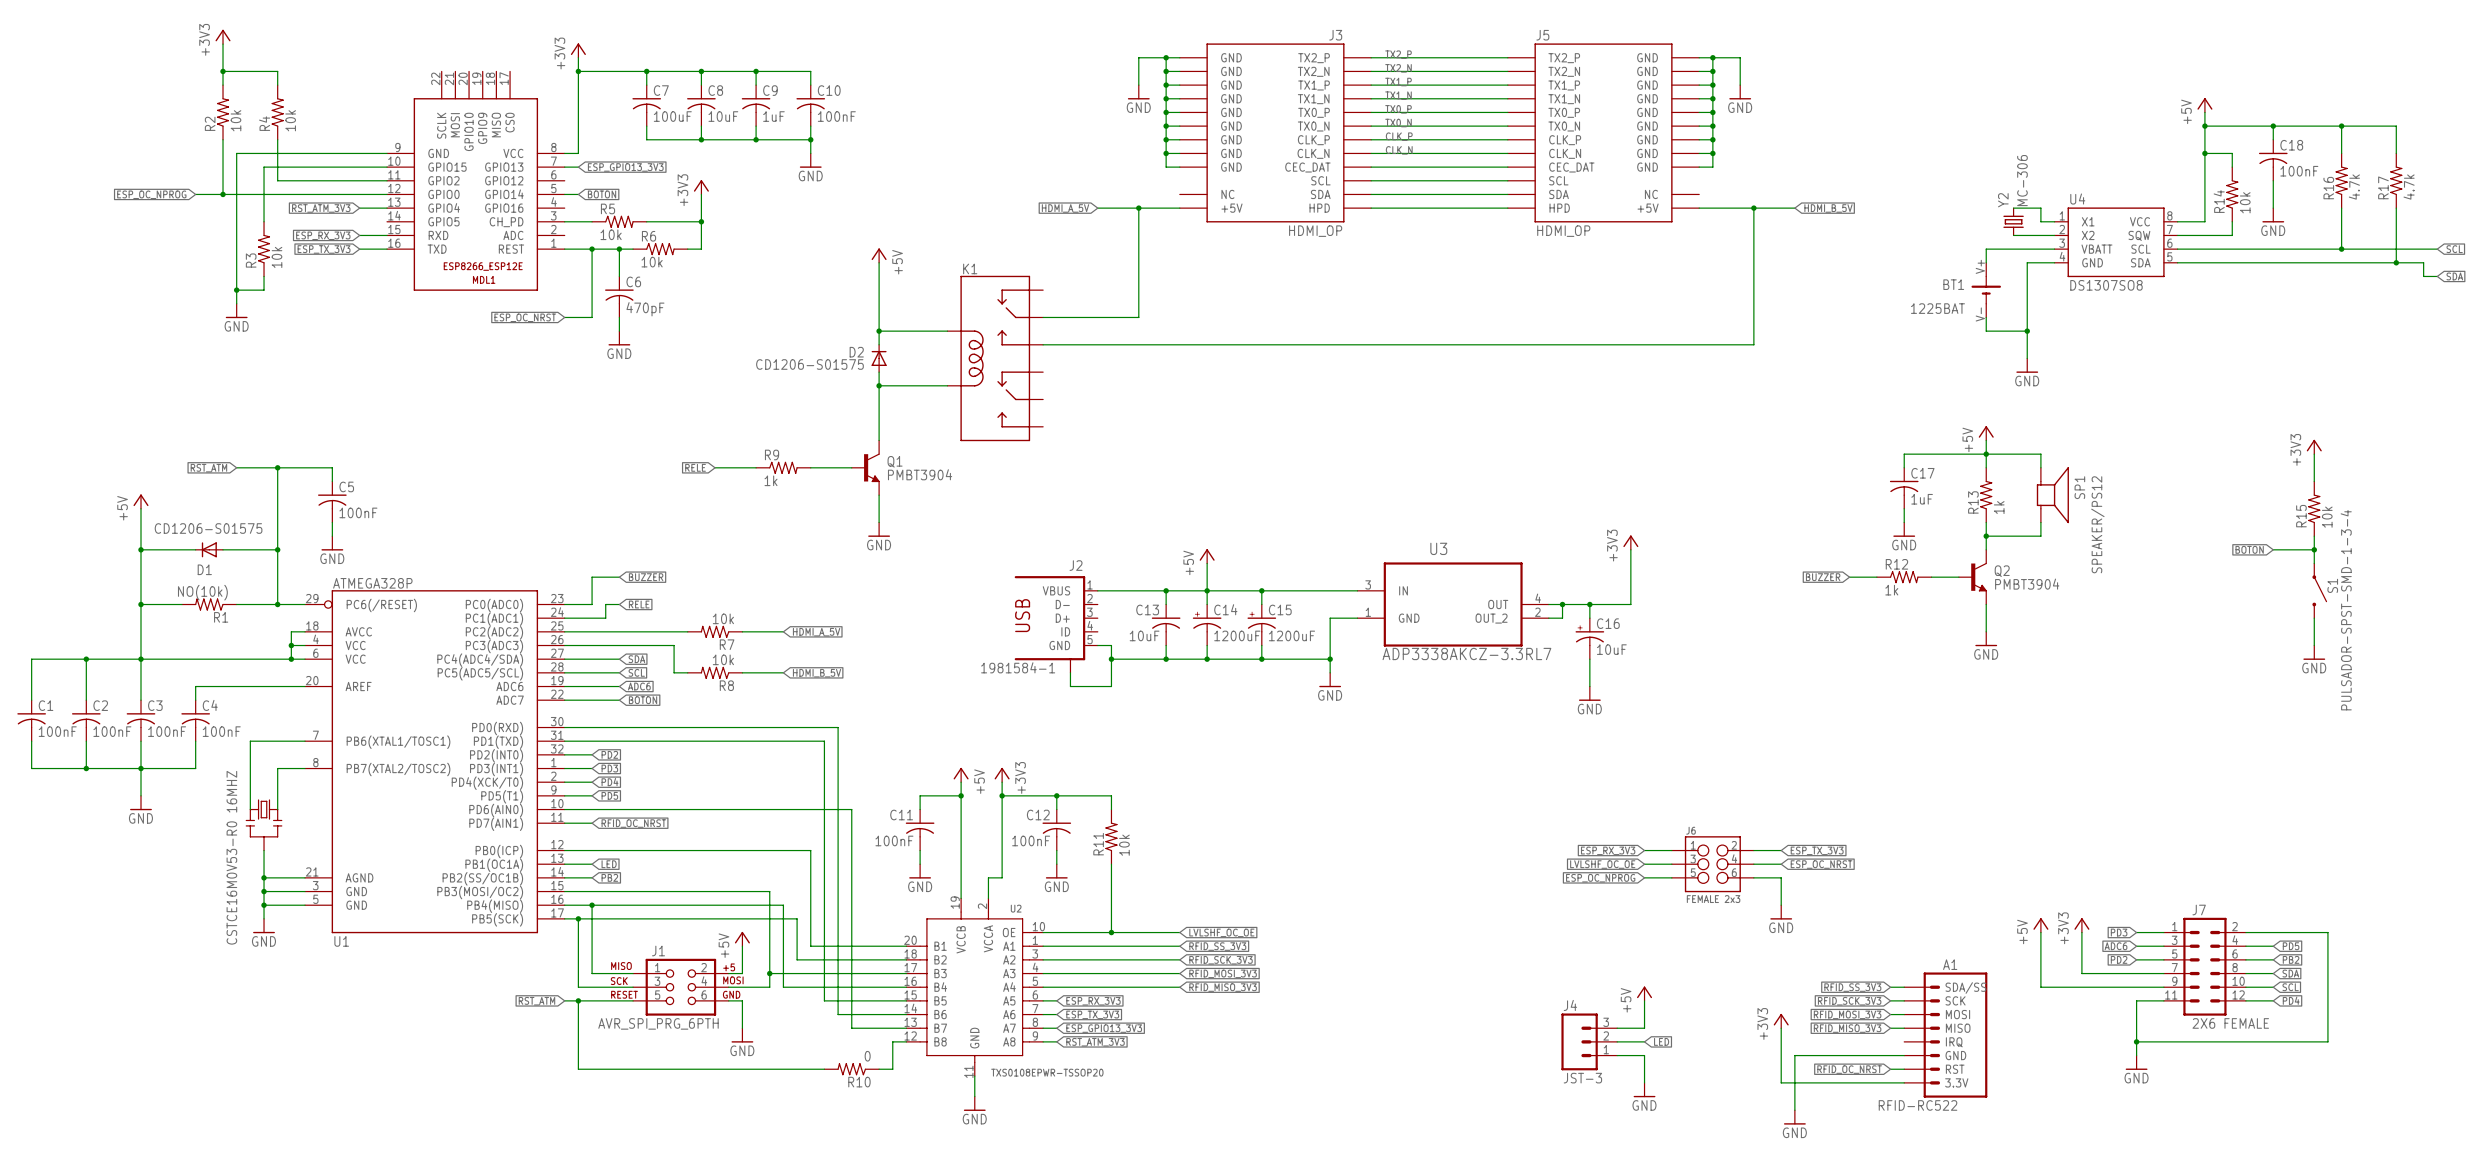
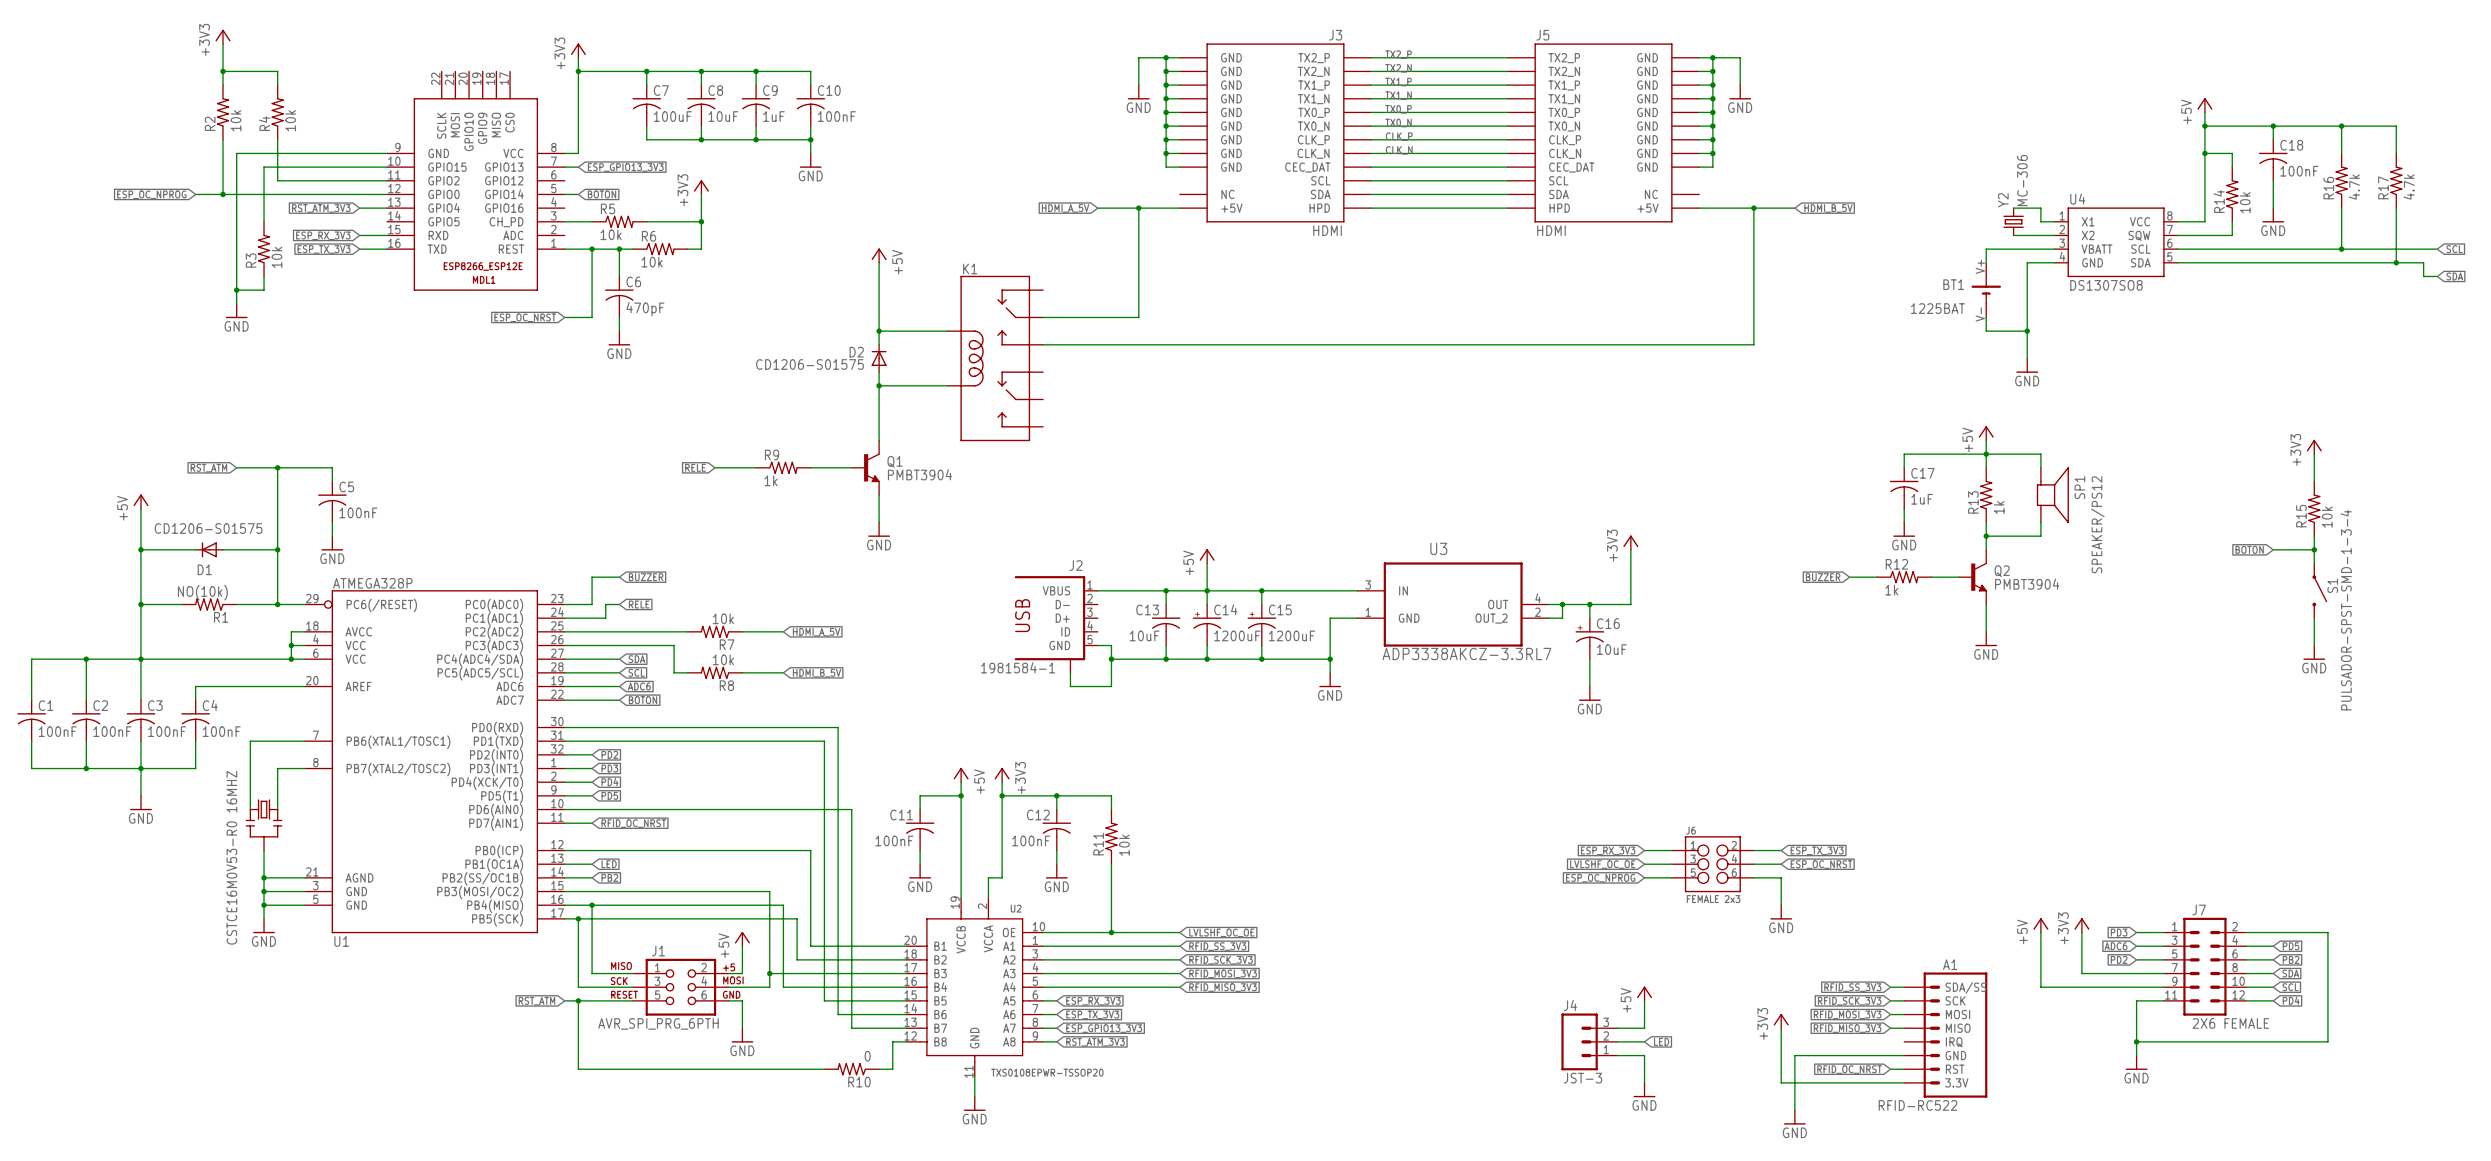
J3 value: HDMI_OP (1315, 231) -> HDMI (1327, 230)
J5 value: HDMI_OP (1563, 231) -> HDMI (1551, 230)

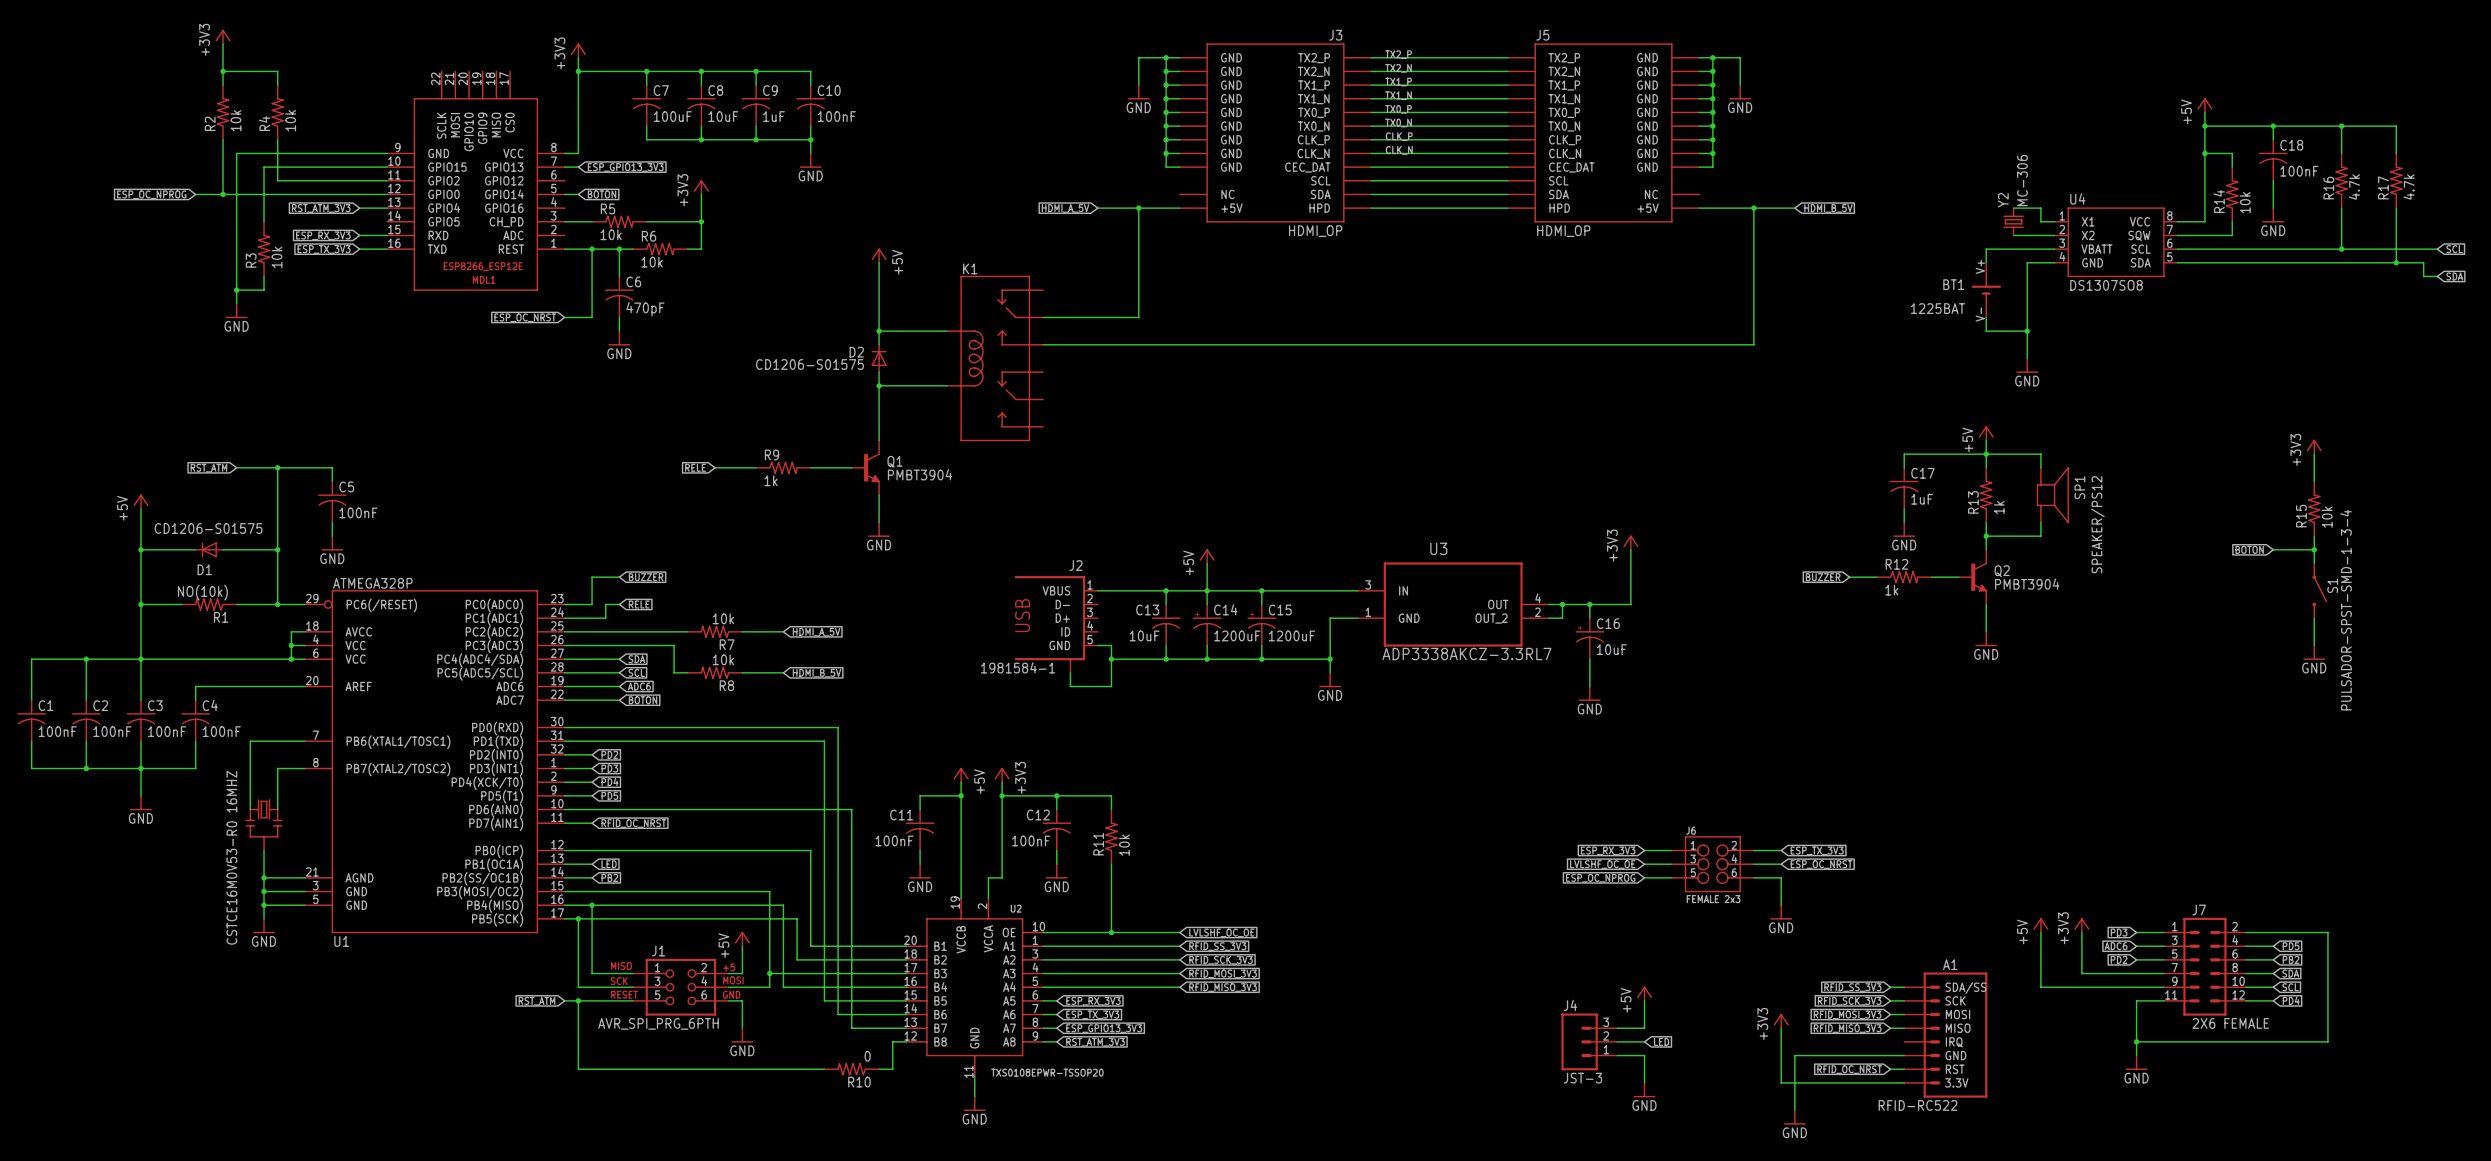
J3 value: HDMI (1327, 230) -> HDMI_OP (1315, 231)
J5 value: HDMI (1551, 230) -> HDMI_OP (1563, 231)

